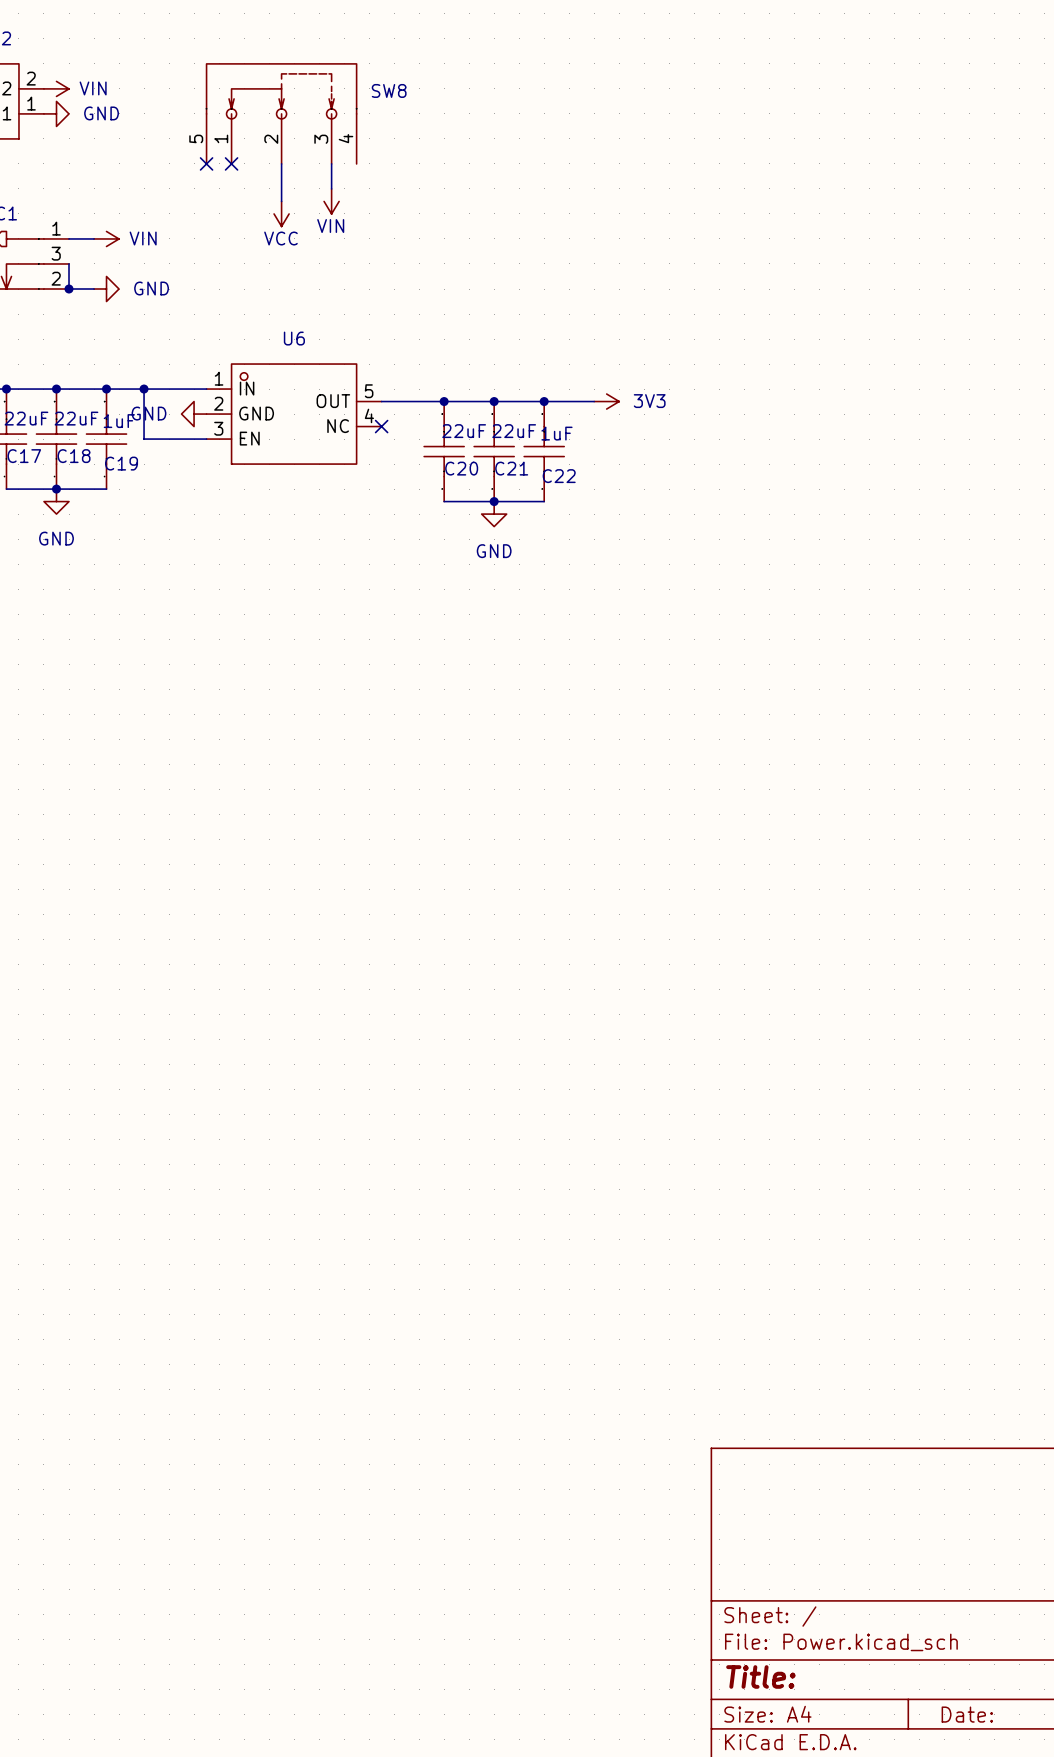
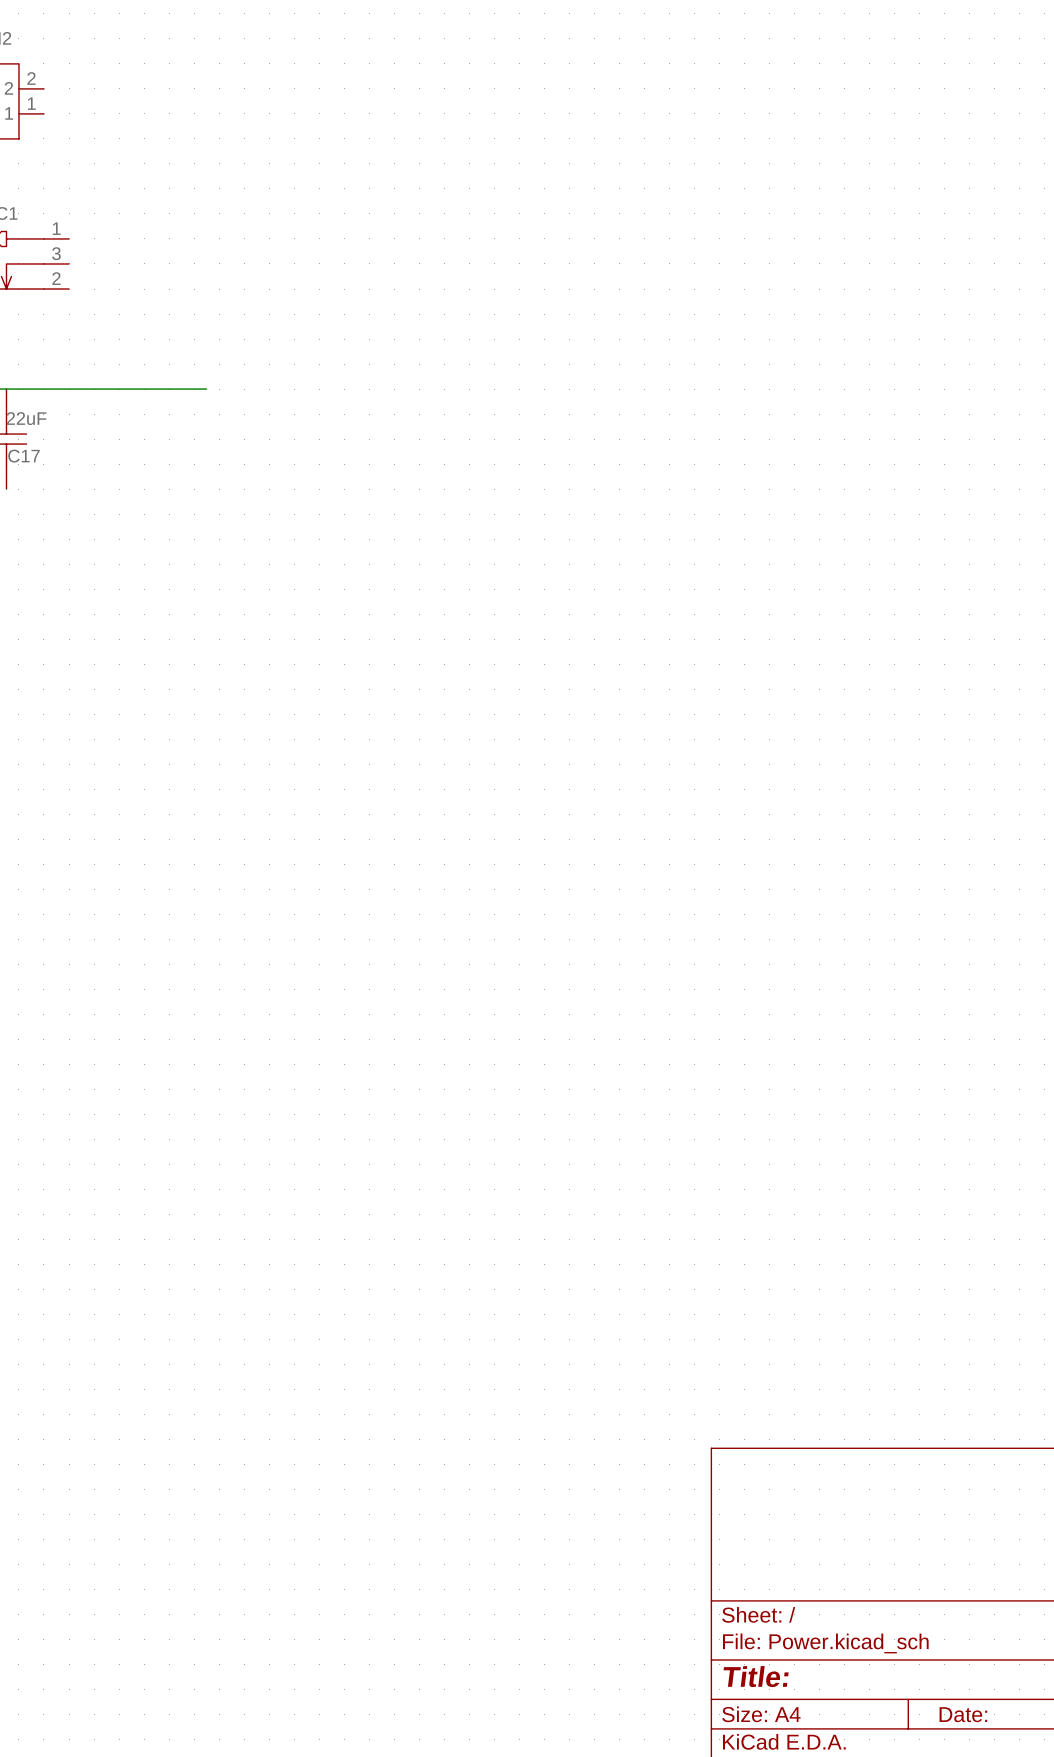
power symbol: VIN (56, 88) -> none
power symbol: GND (56, 113) -> none
SW8: (281, 113) -> none
no-connect mark: (206, 163) -> none
no-connect mark: (231, 163) -> none
wire: (281, 163) (281, 201) -> none
wire: (331, 163) (331, 188) -> none
power symbol: VIN (331, 201) -> none
power symbol: VCC (281, 213) -> none
wire: (69, 238) (94, 238) -> none
power symbol: VIN (106, 238) -> none
wire: (69, 263) (69, 289) (94, 289) -> none
junction: (69, 289) -> none
power symbol: GND (106, 289) -> none
junction: (6, 389) -> none
junction: (56, 389) -> none
junction: (106, 389) -> none
wire: (144, 389) (144, 439) (206, 439) -> none
junction: (144, 389) -> none
wire: (381, 401) (594, 401) -> none
junction: (444, 401) -> none
junction: (494, 401) -> none
junction: (544, 401) -> none
power symbol: 3V3 (606, 401) -> none
power symbol: GND (194, 414) -> none
U6: (294, 414) -> none
no-connect mark: (381, 426) -> none
C18: 22uF (56, 439) -> none
C19: 1uF (106, 439) -> none
C20: 22uF (444, 451) -> none
C21: 22uF (494, 451) -> none
C22: 1uF (544, 451) -> none
wire: (6, 489) (106, 489) -> none
junction: (56, 489) -> none
power symbol: GND (56, 501) -> none
wire: (444, 501) (544, 501) -> none
junction: (494, 501) -> none
power symbol: GND (494, 514) -> none

